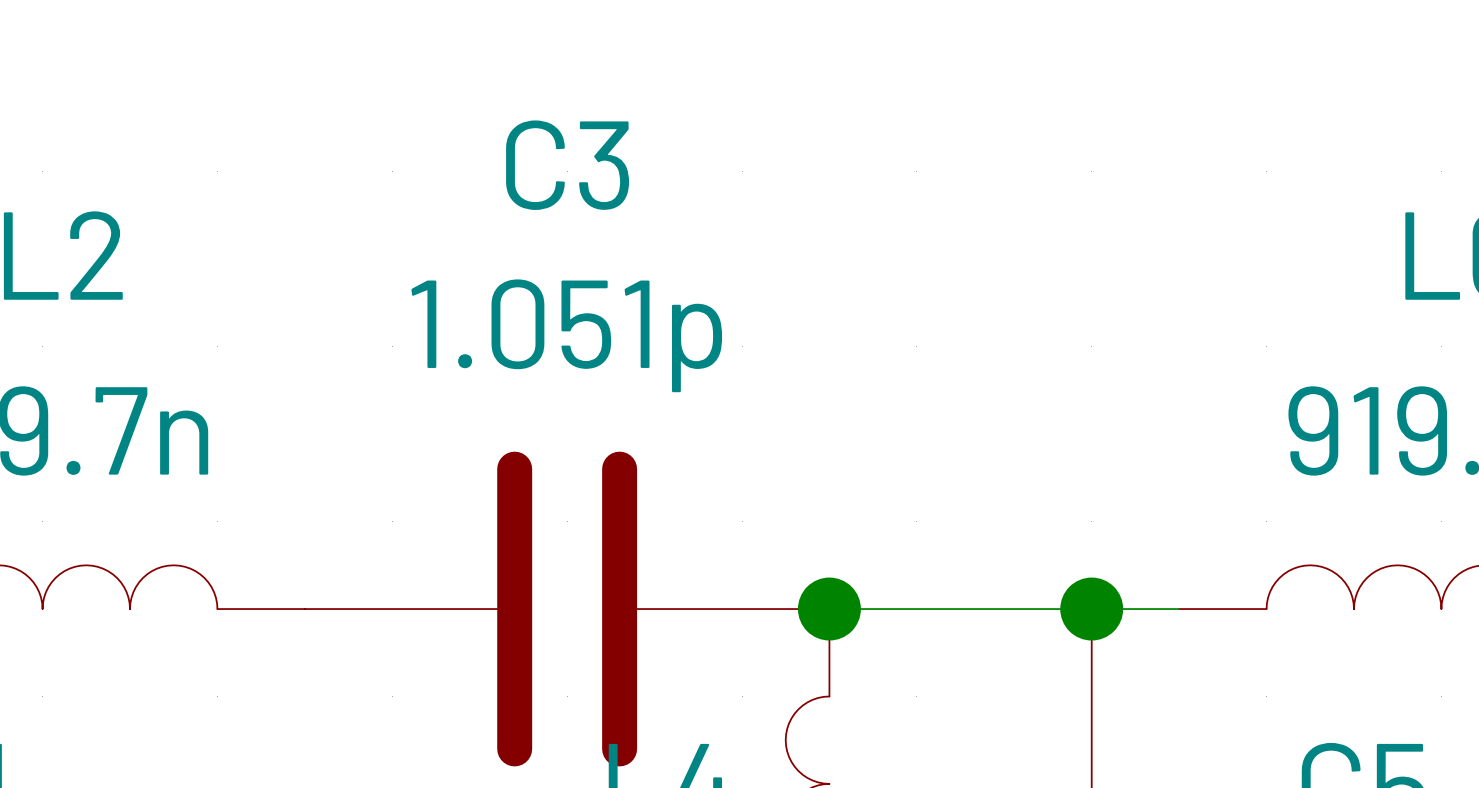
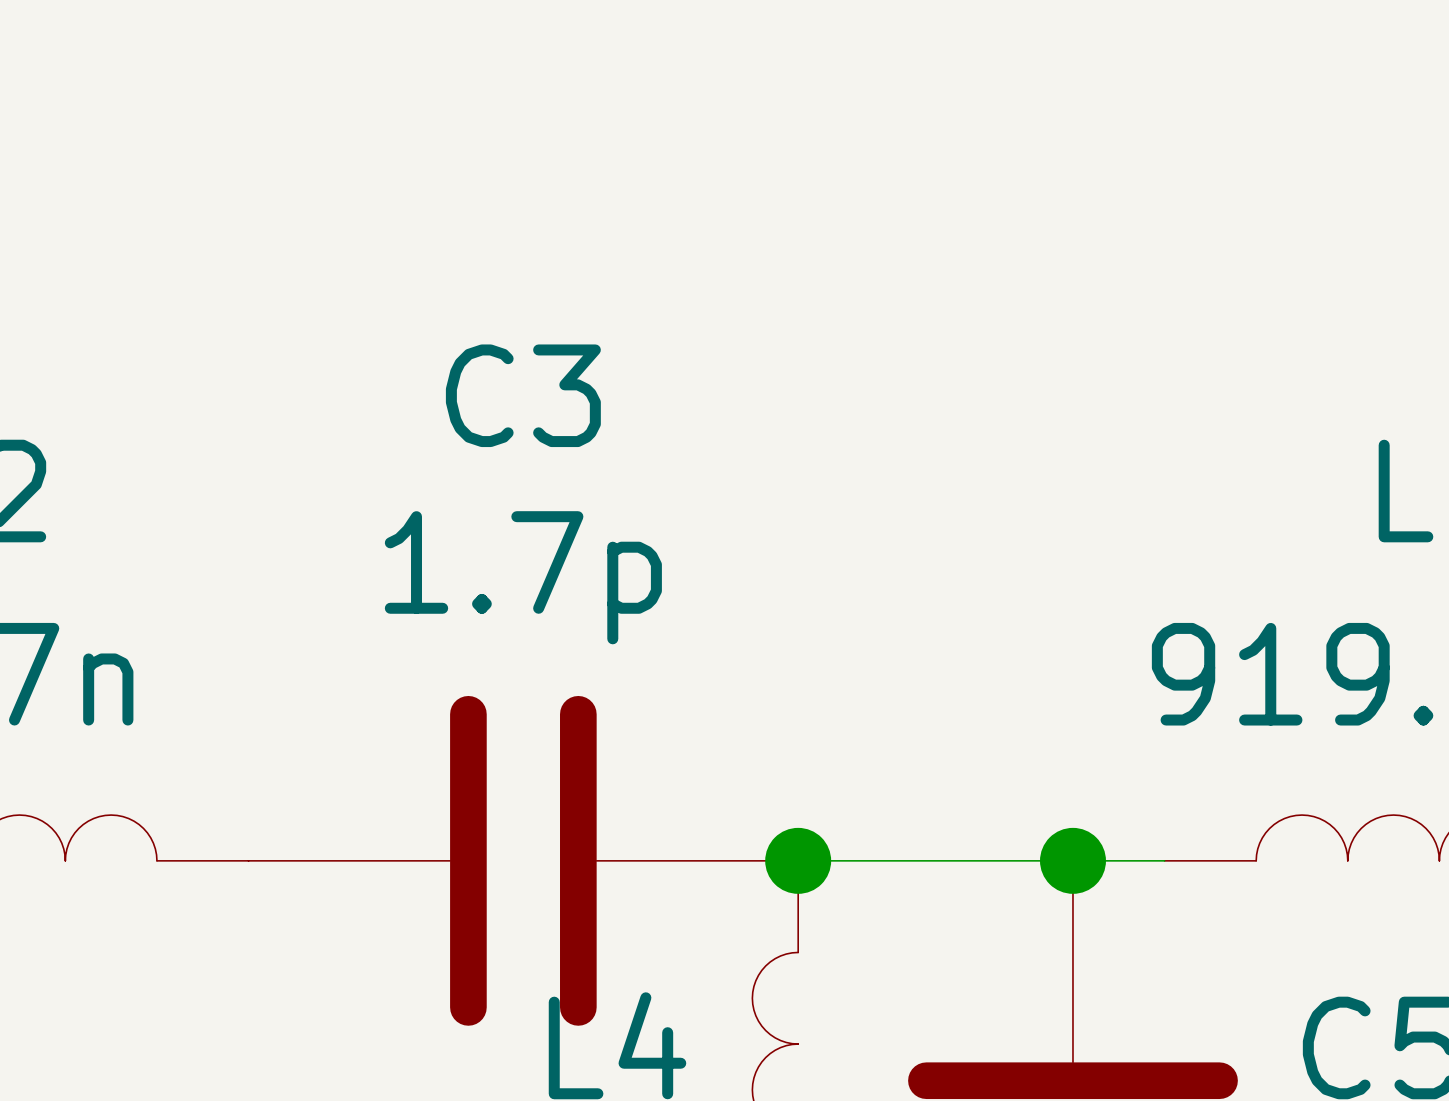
C3 value: 1.051p (566, 335) -> 1.7p (523, 577)

